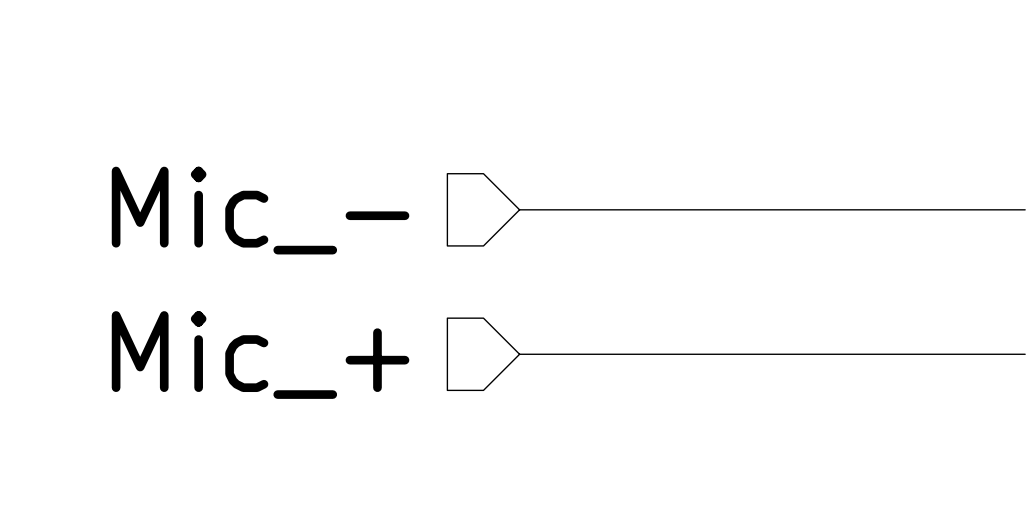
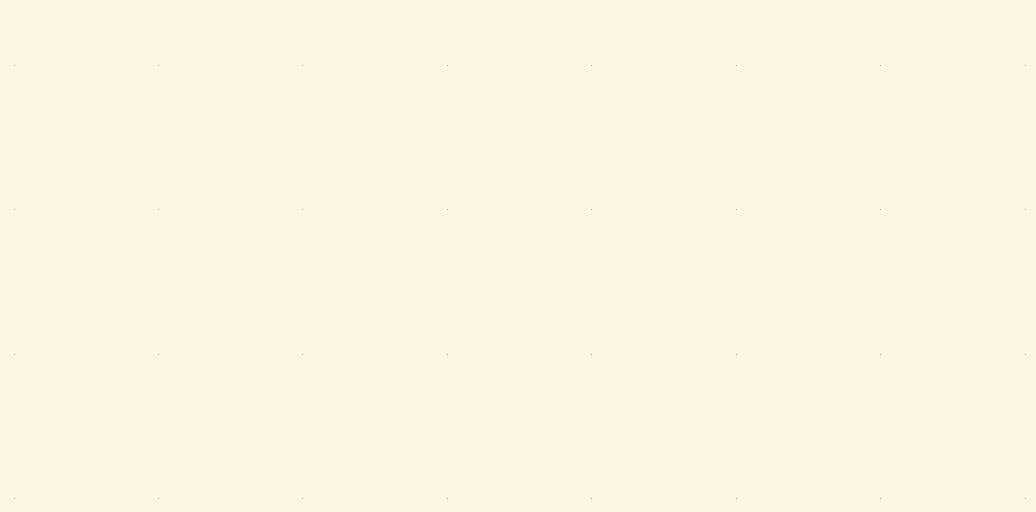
wire: (519, 209) (1025, 209) -> none
hierarchical label: Mic_- (260, 210) -> none
wire: (519, 354) (1025, 354) -> none
hierarchical label: Mic_+ (260, 355) -> none

